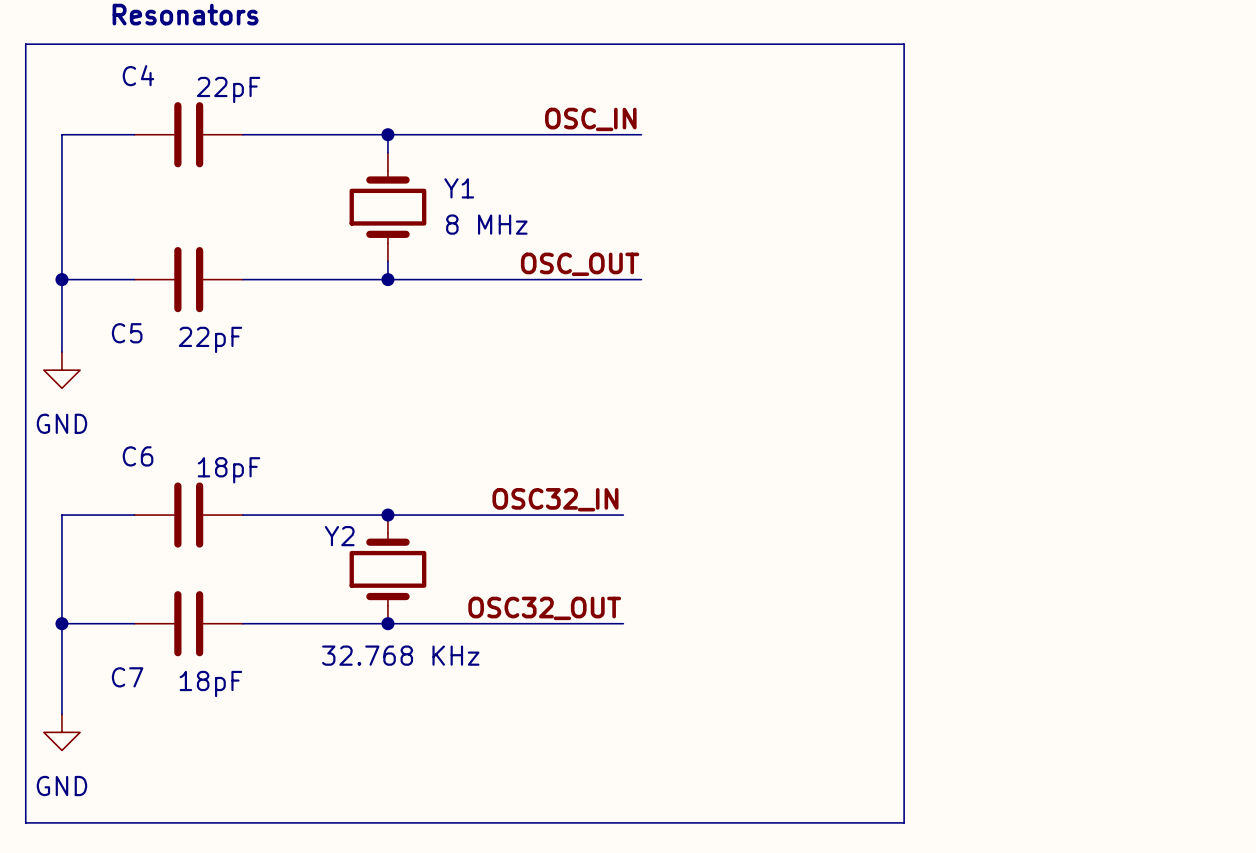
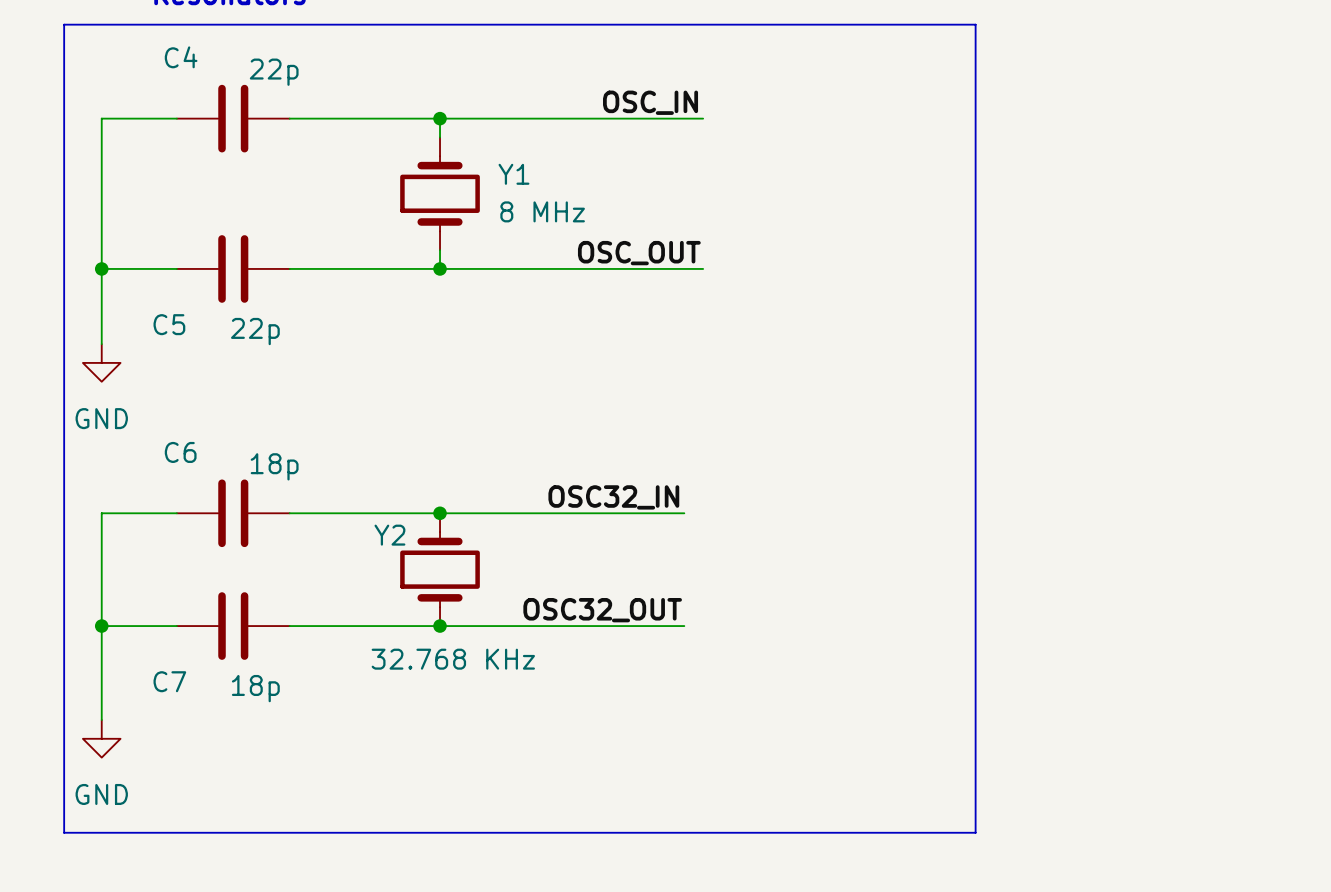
C4 value: 22pF (228, 89) -> 22p (274, 72)
C5 value: 22pF (210, 339) -> 22p (255, 331)
C6 value: 18pF (229, 470) -> 18p (274, 466)
C7 value: 18pF (210, 684) -> 18p (255, 688)

